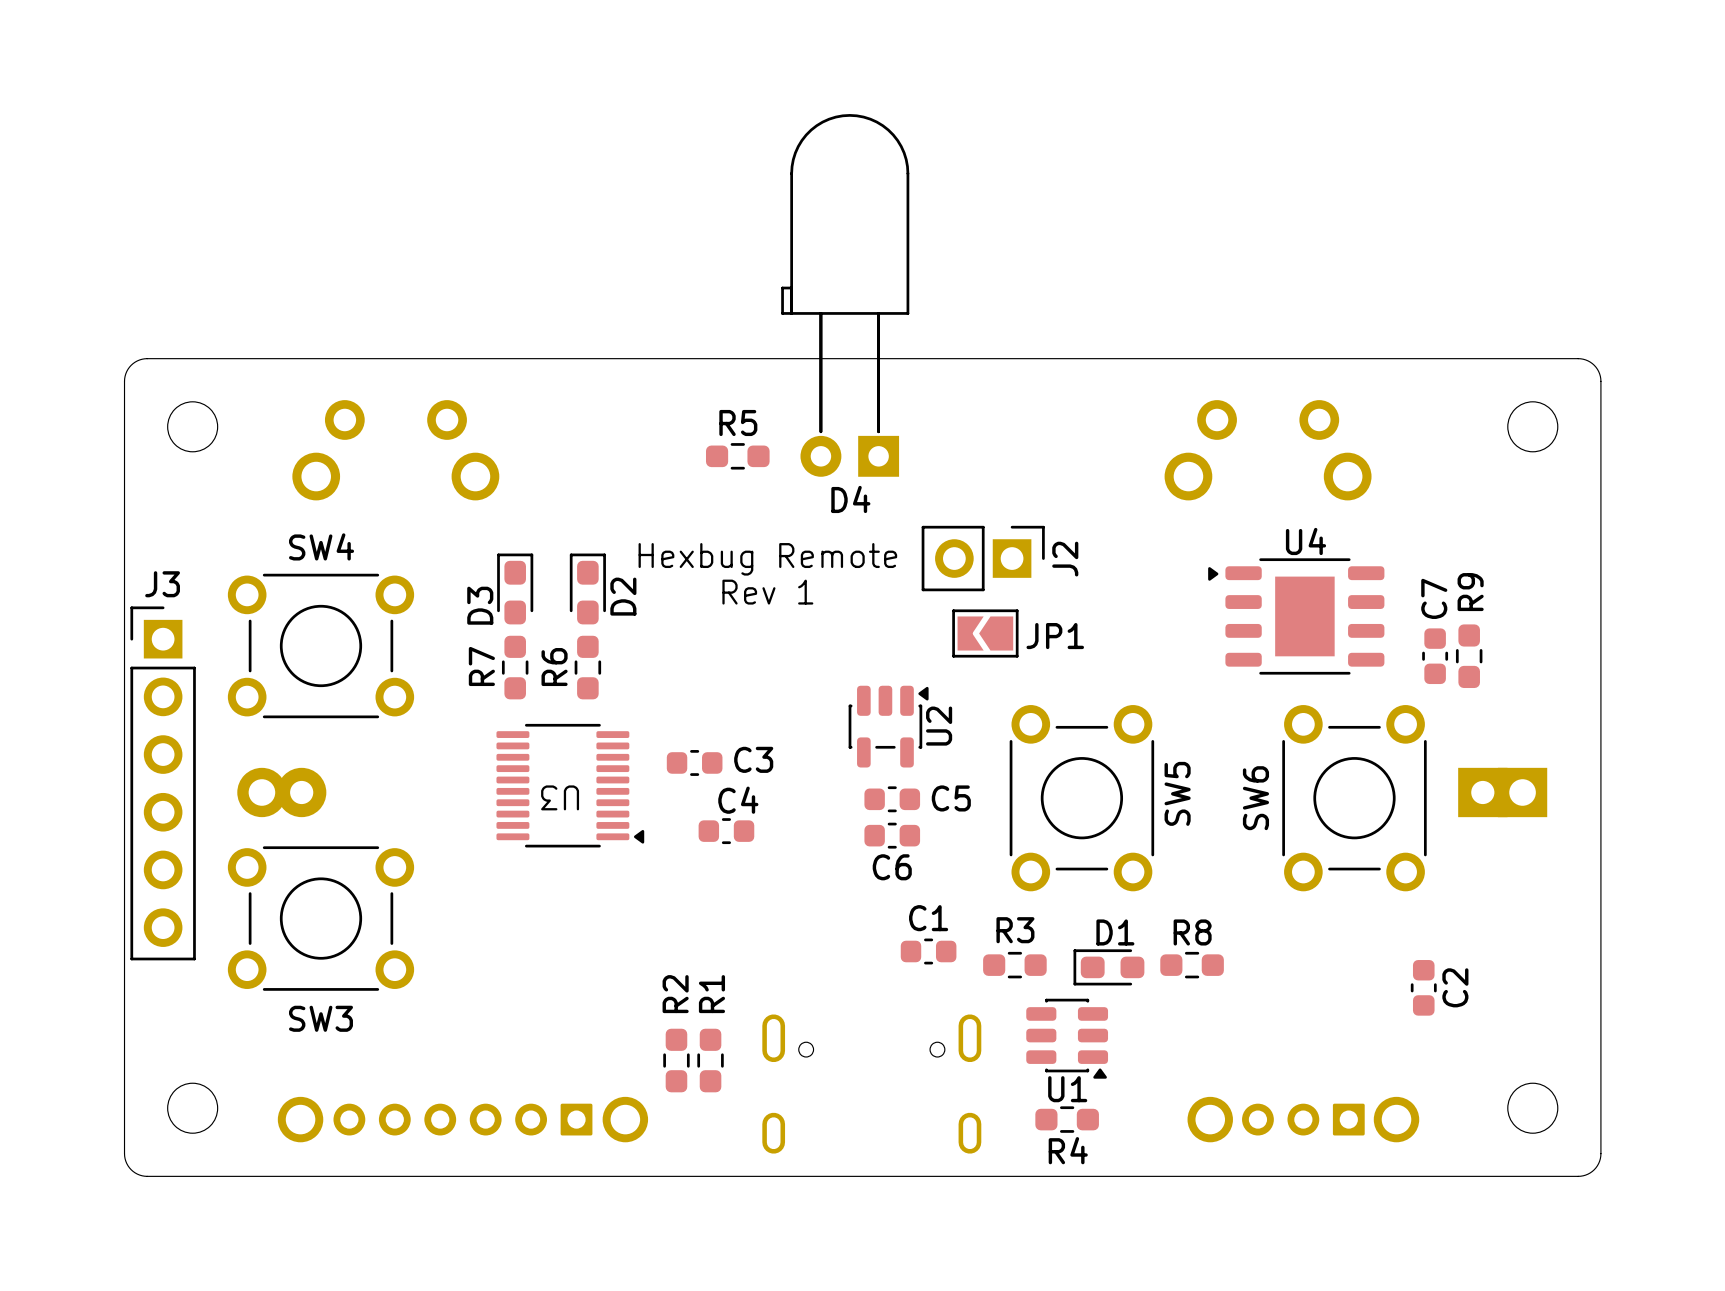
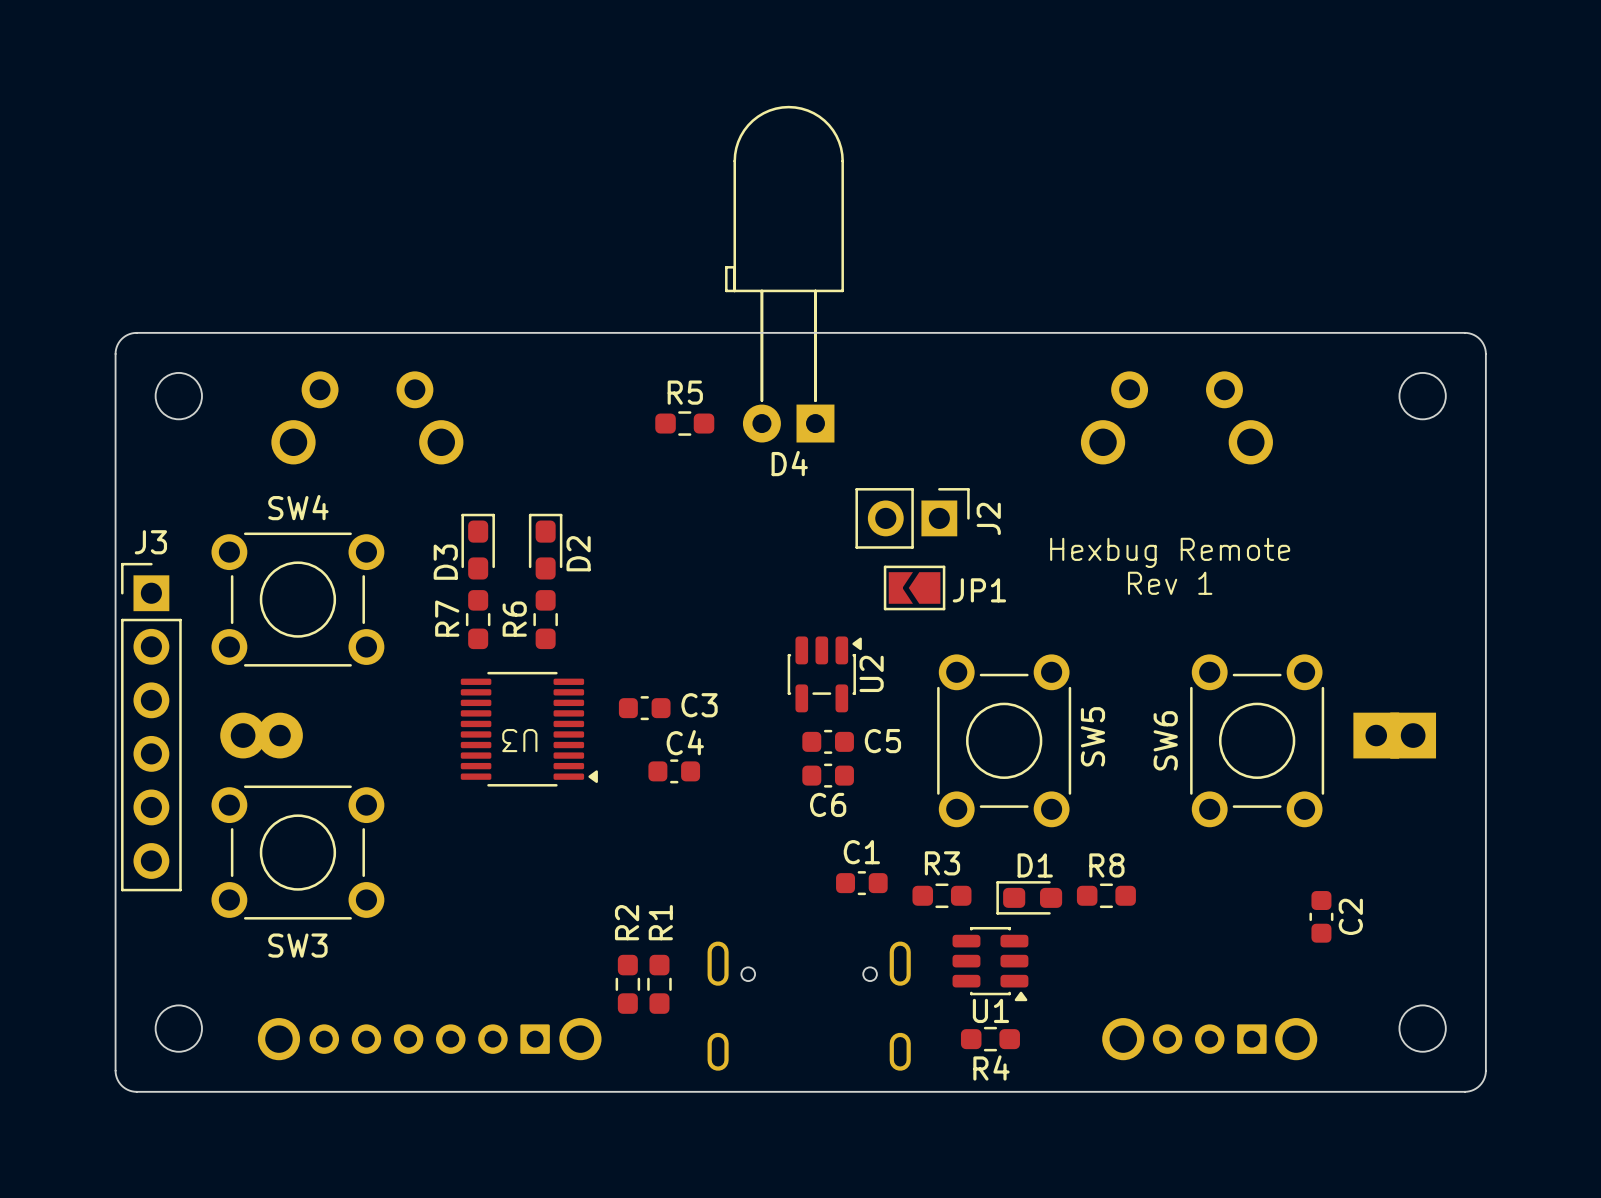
text position: Hexbug Remote (767, 559) -> Hexbug Remote (1170, 552)
text position: Rev 1 (767, 592) -> Rev 1 (1170, 583)
U4: (1296, 616) -> none
C7: (1435, 656) -> none
R9: (1469, 656) -> none

